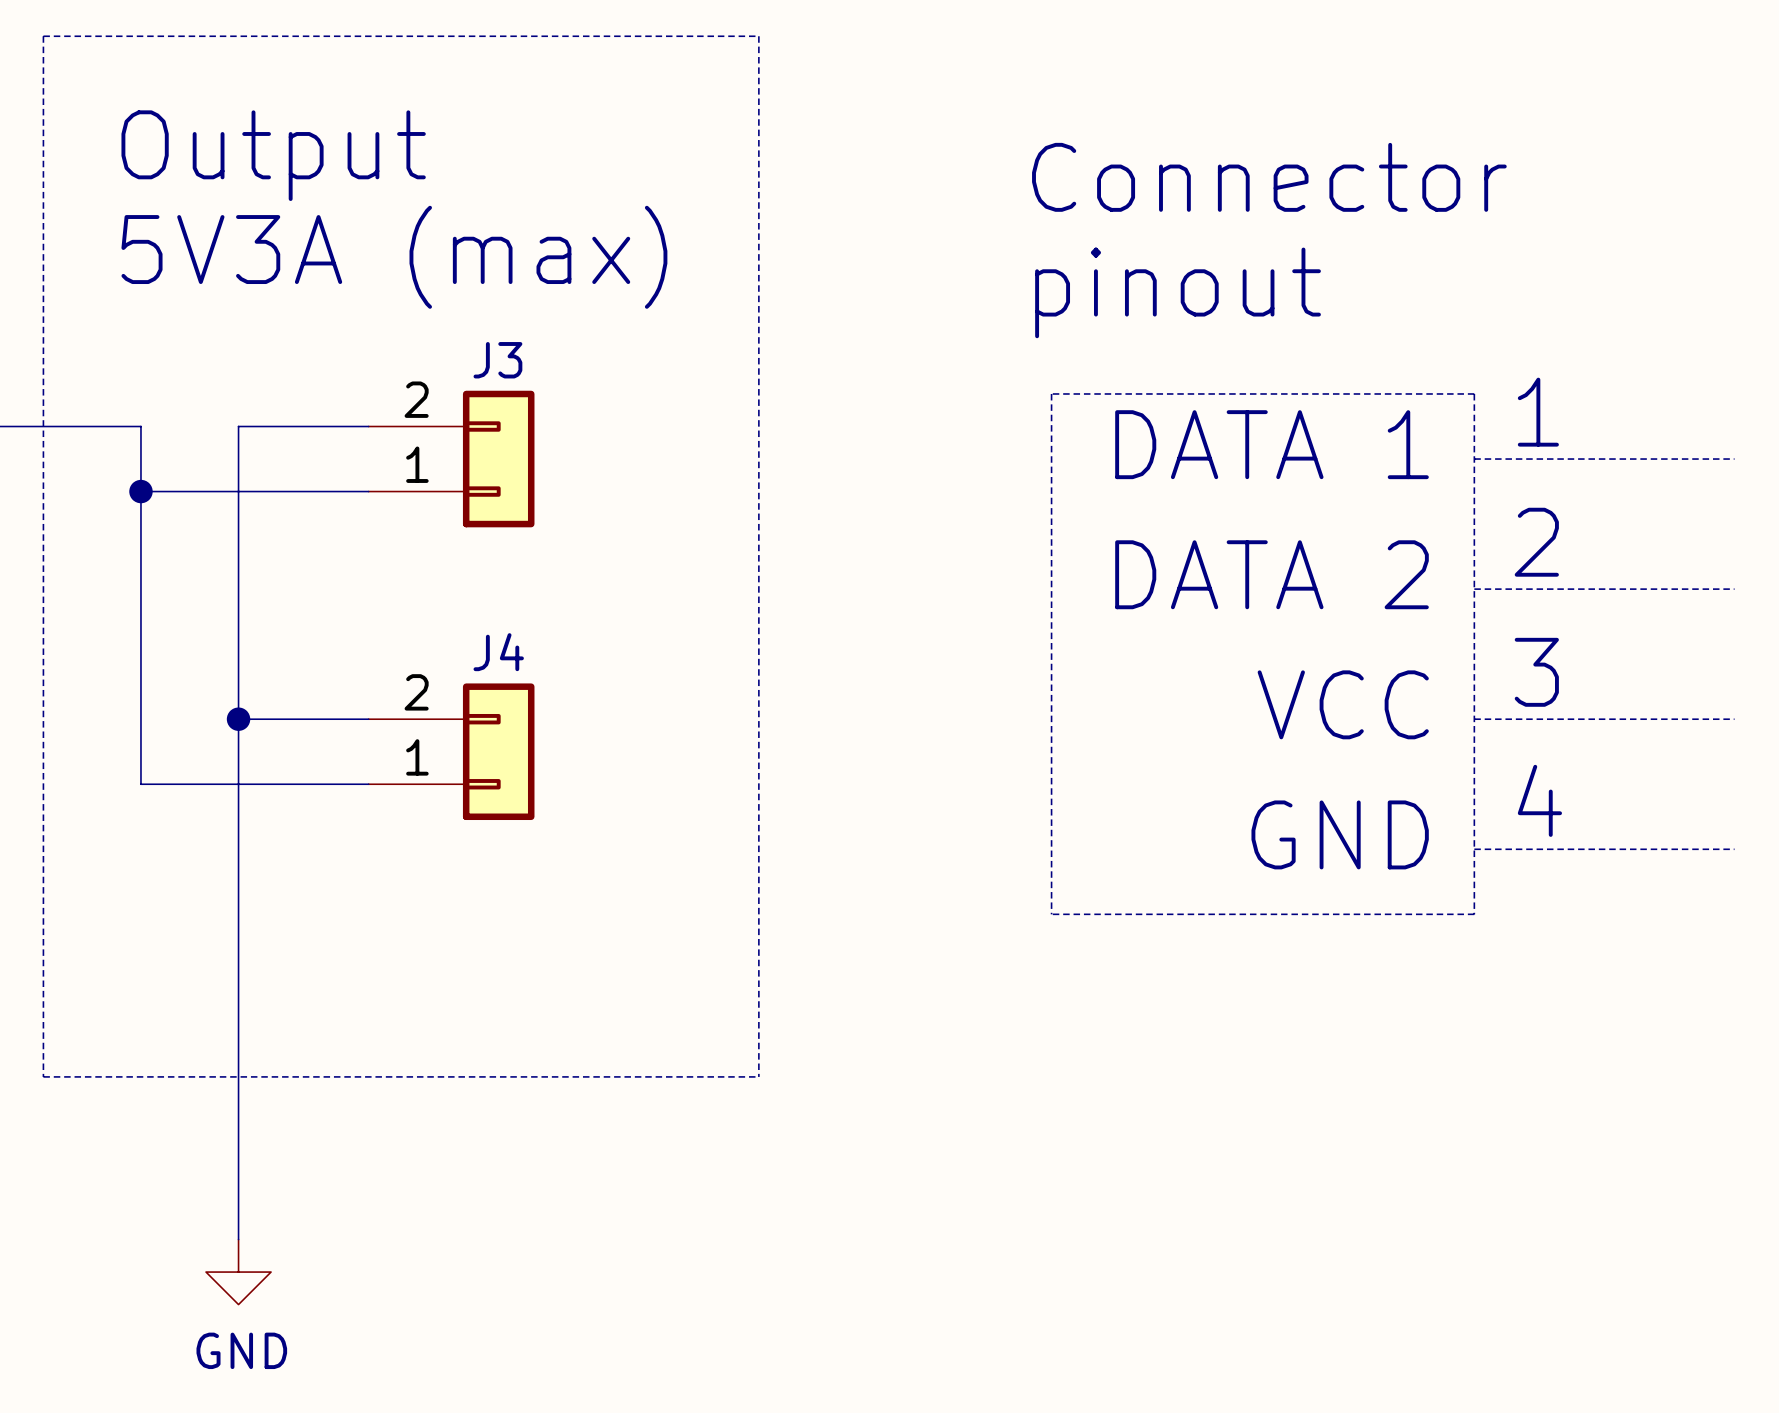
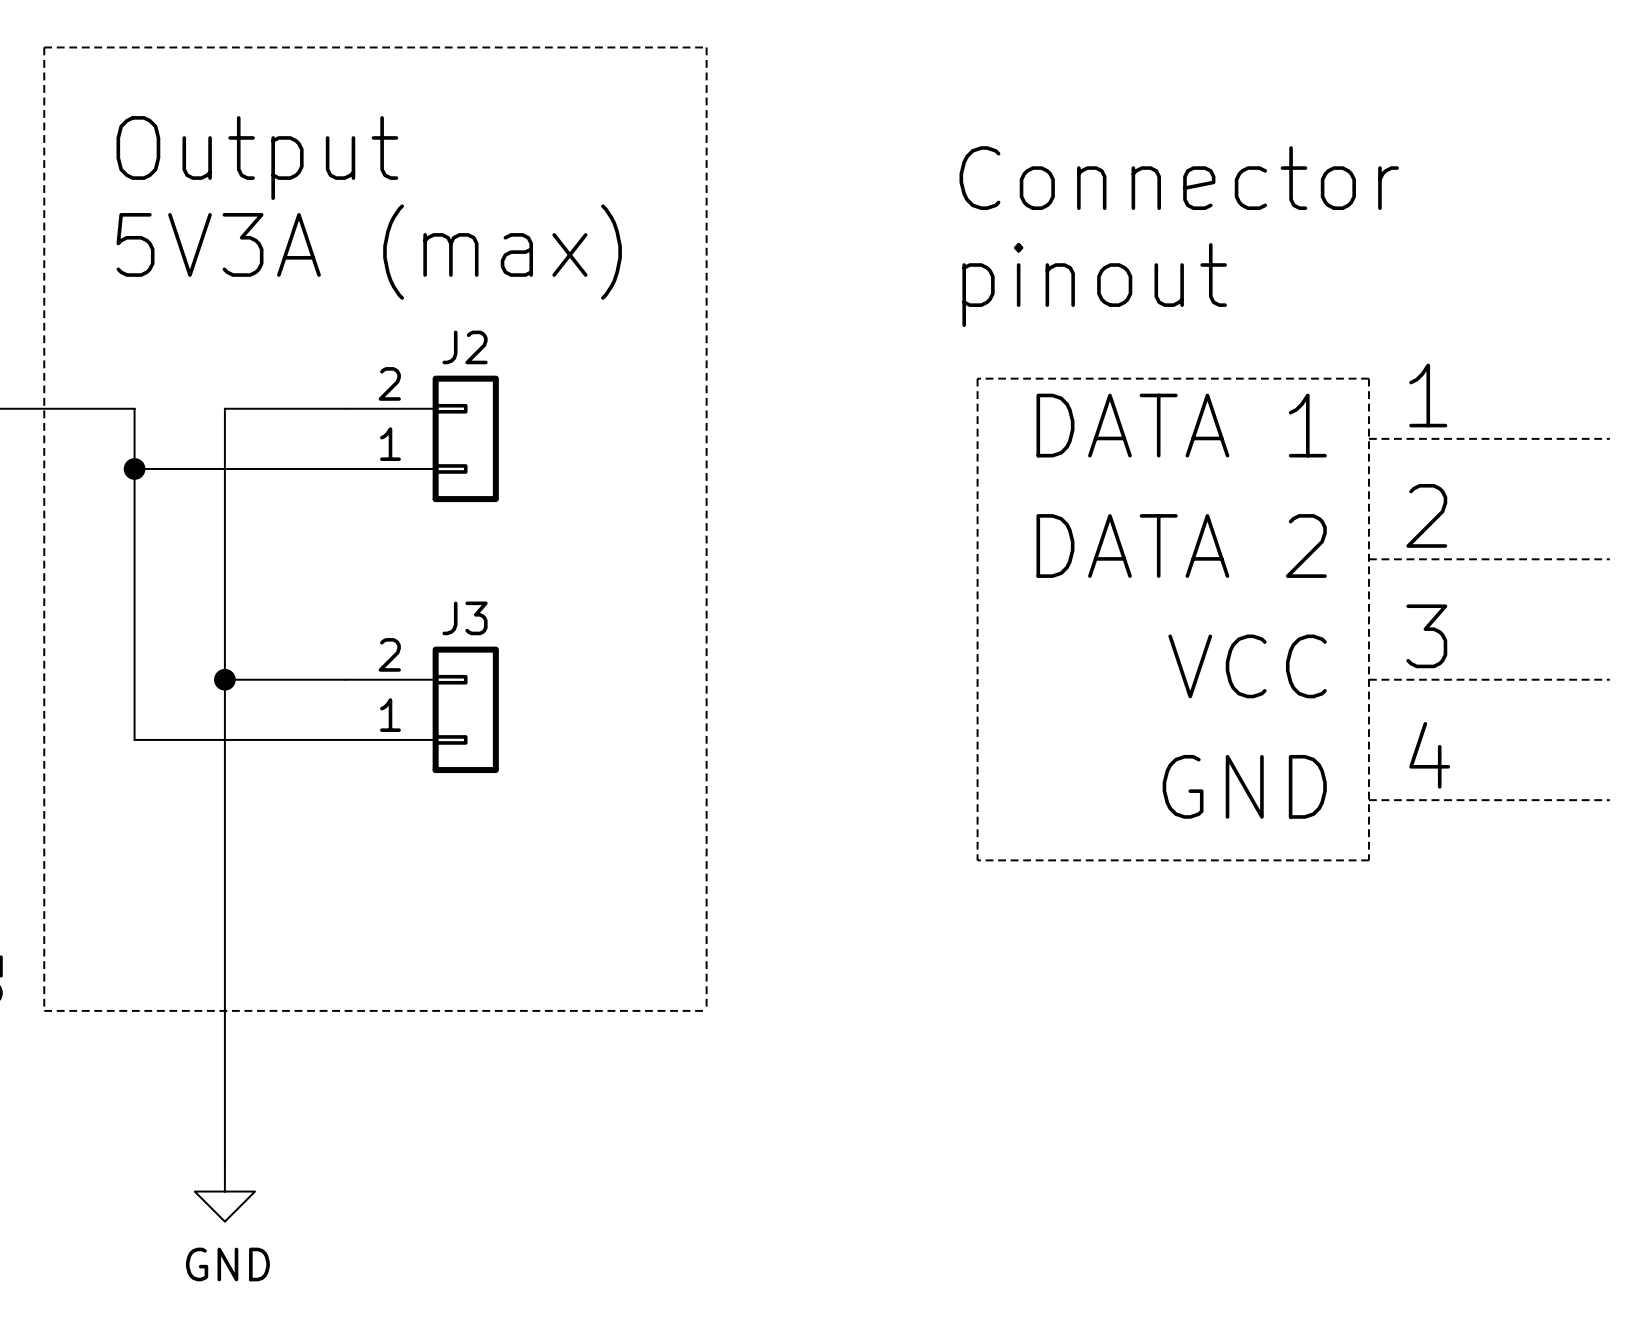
J3 name: J3 (497, 360) -> J2 (465, 347)
J4 name: J4 (498, 652) -> J3 (465, 618)

